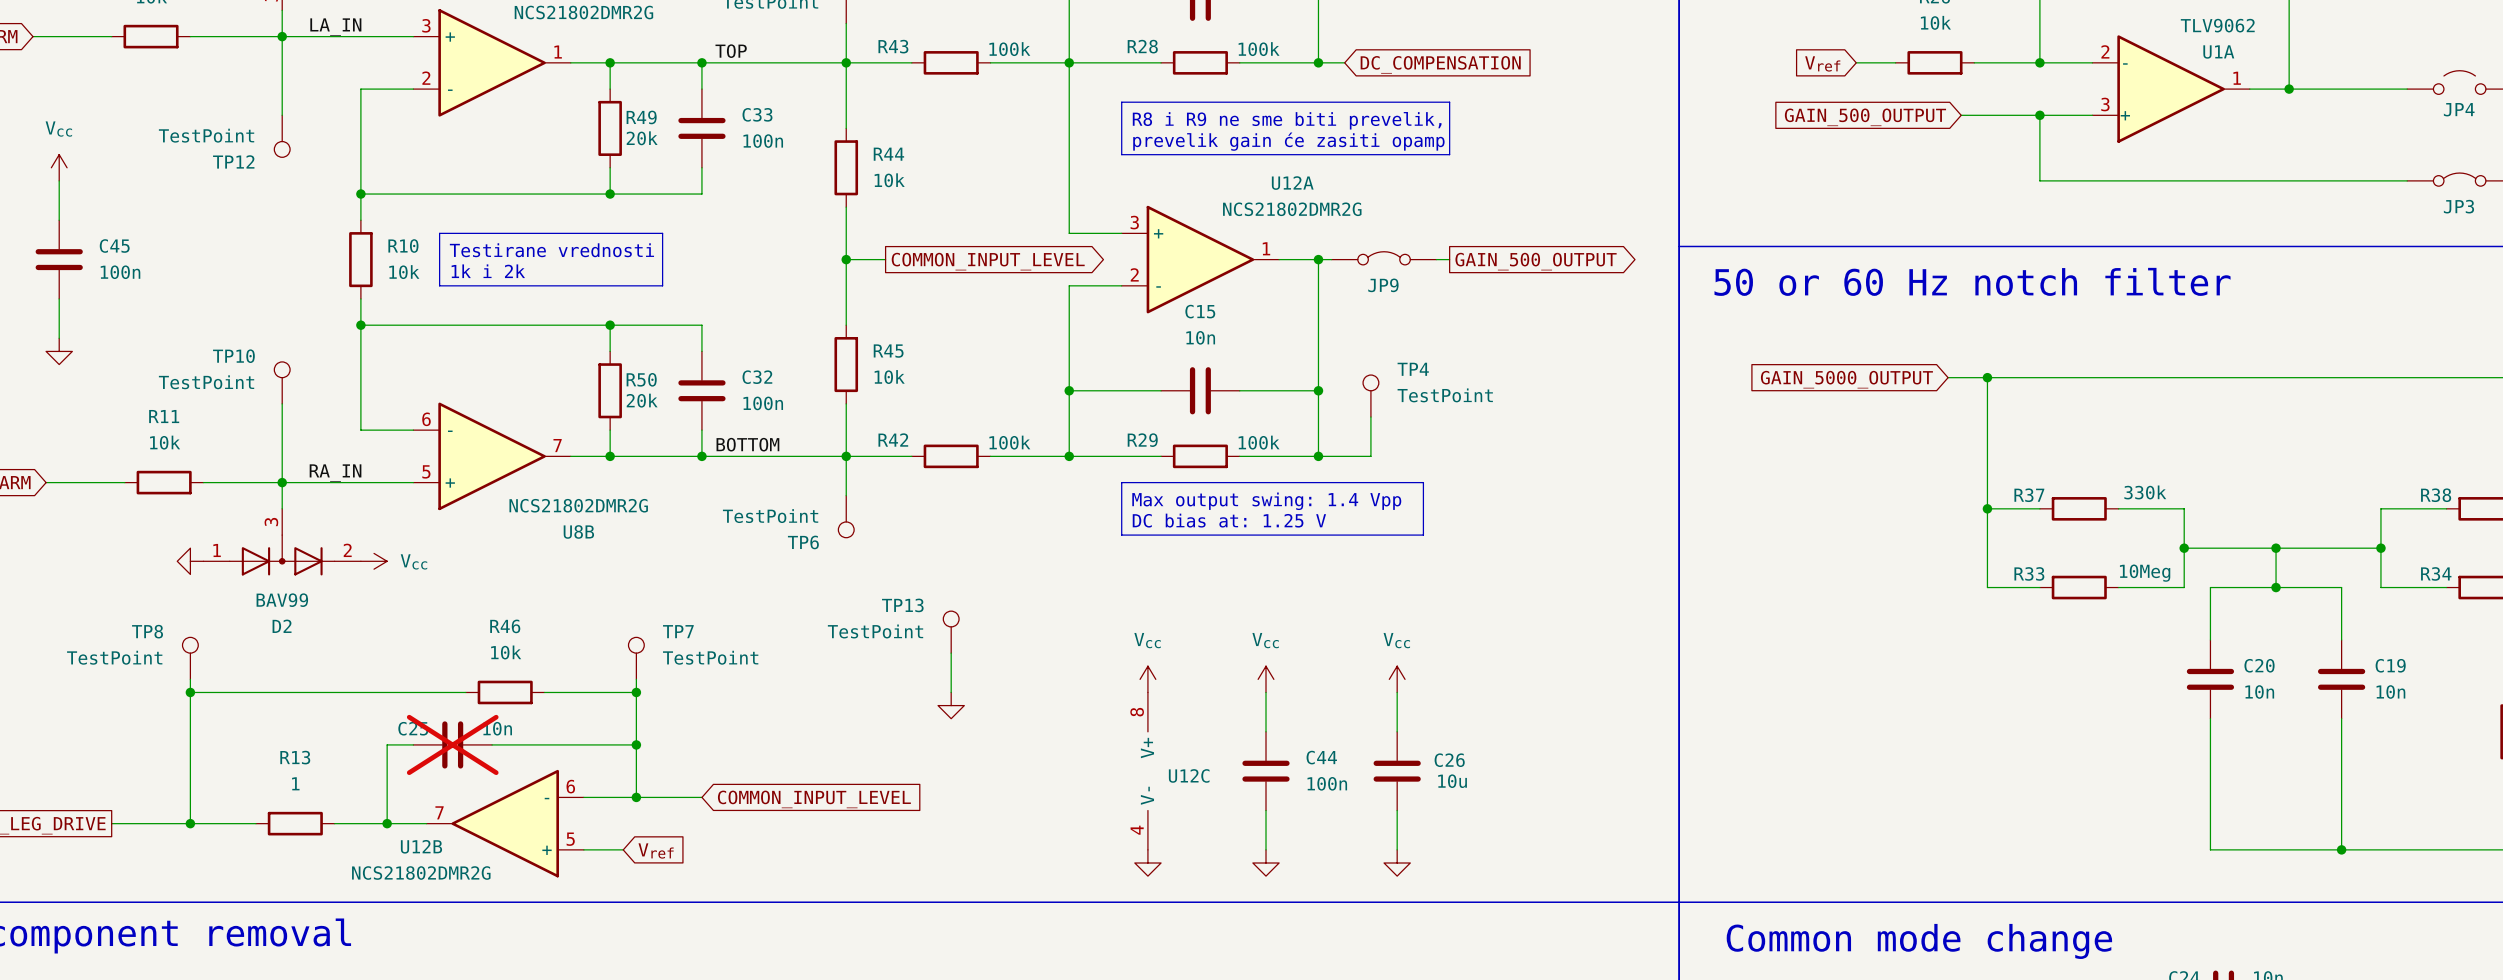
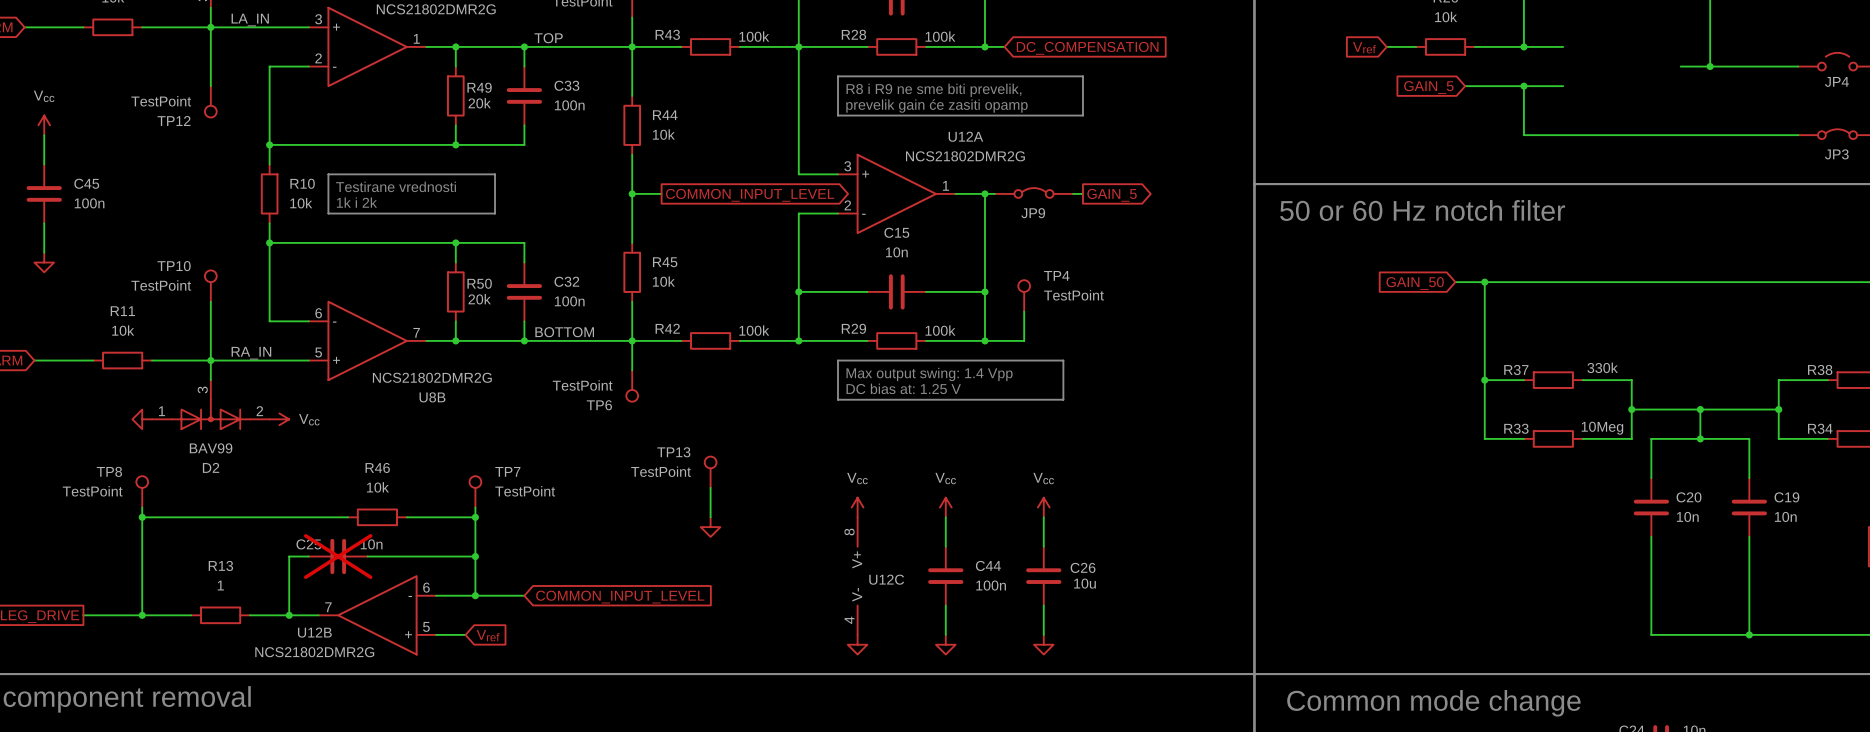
U1A: TLV9062 (2171, 89) -> none
global label: GAIN_500_OUTPUT (1865, 117) -> GAIN_5 (1428, 87)
global label: GAIN_500_OUTPUT (1536, 261) -> GAIN_5 (1112, 195)
global label: GAIN_5000_OUTPUT (1846, 379) -> GAIN_50 (1415, 283)

